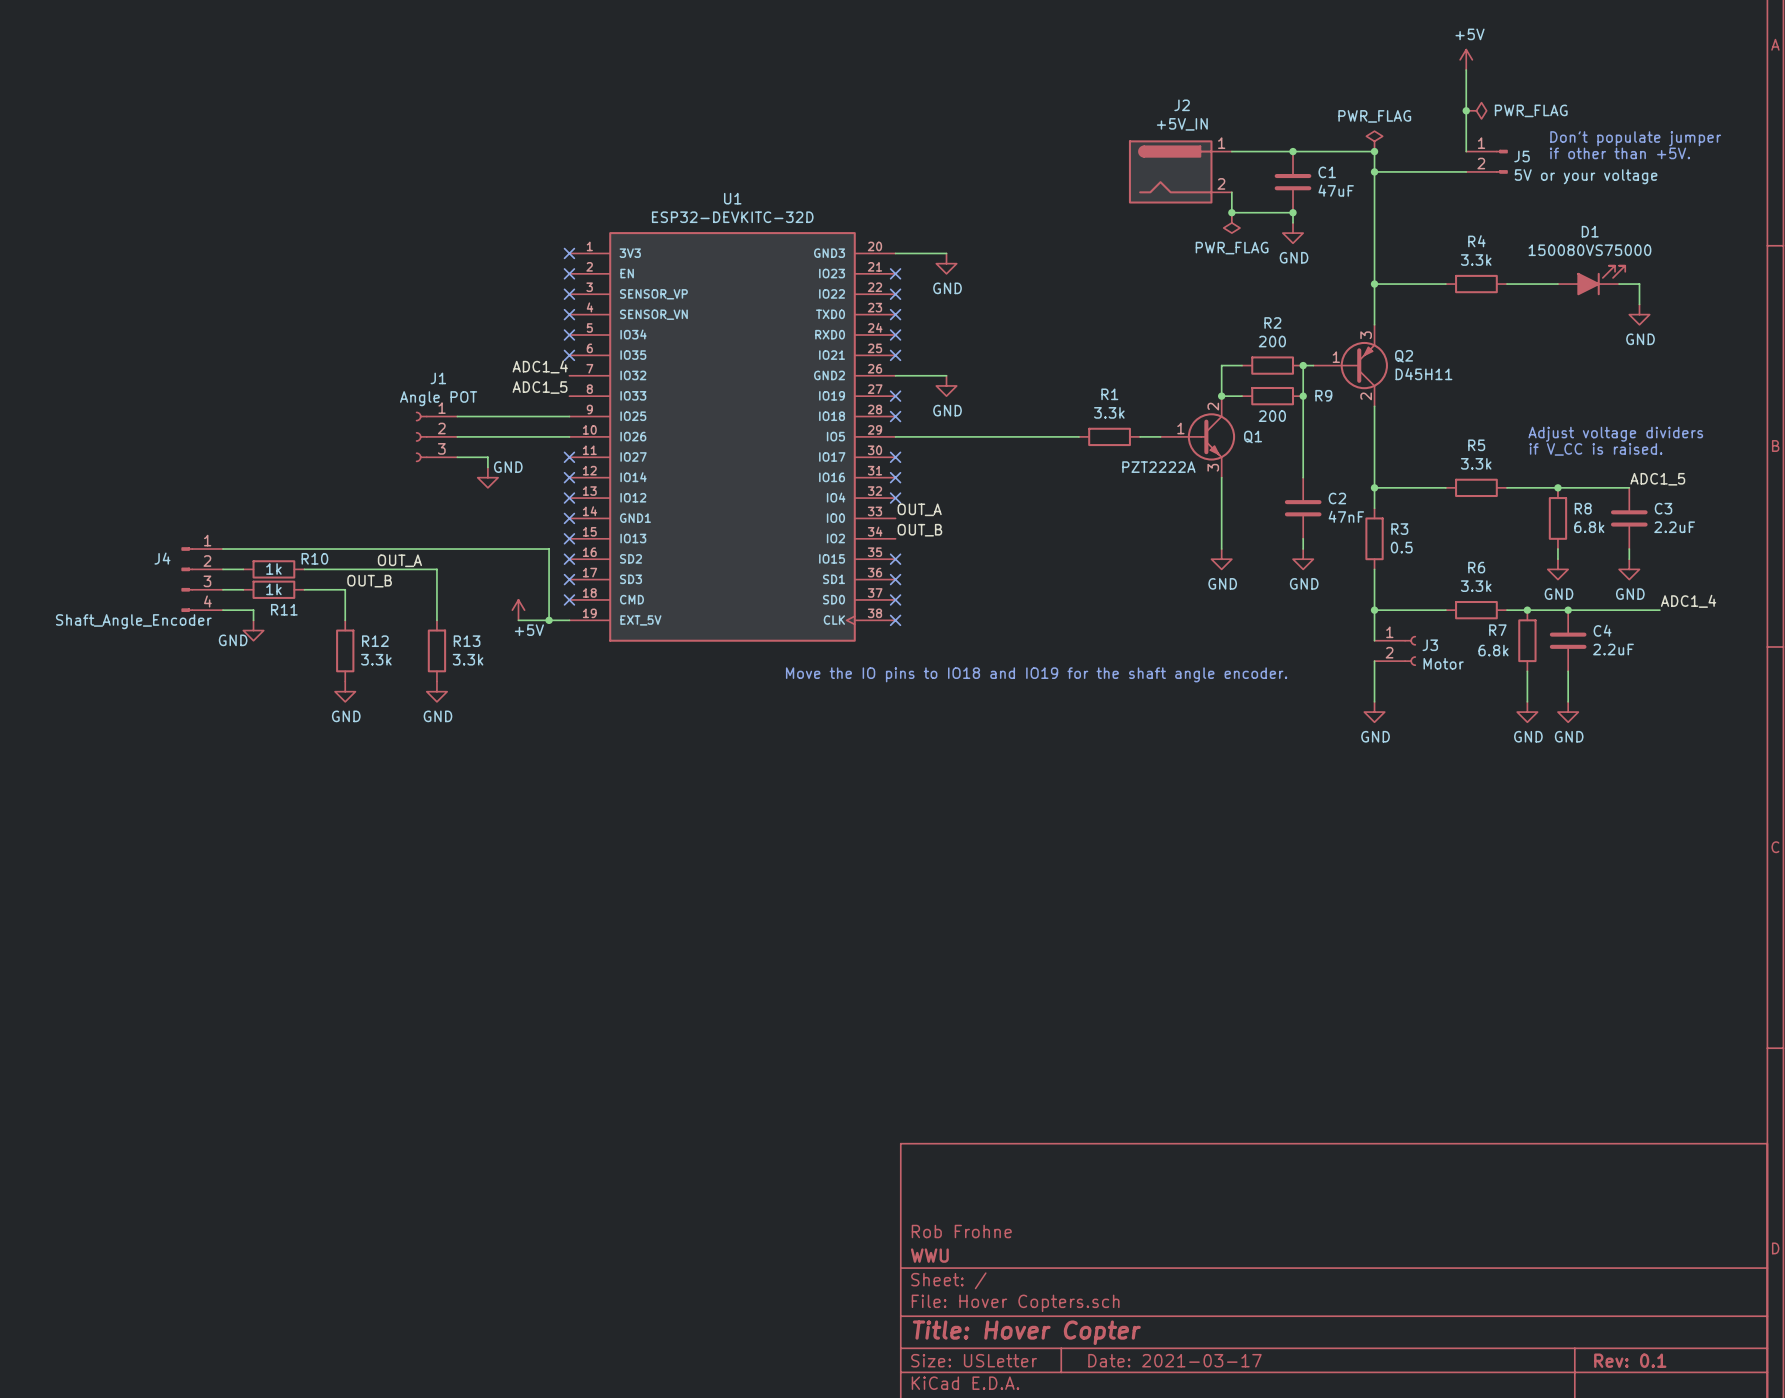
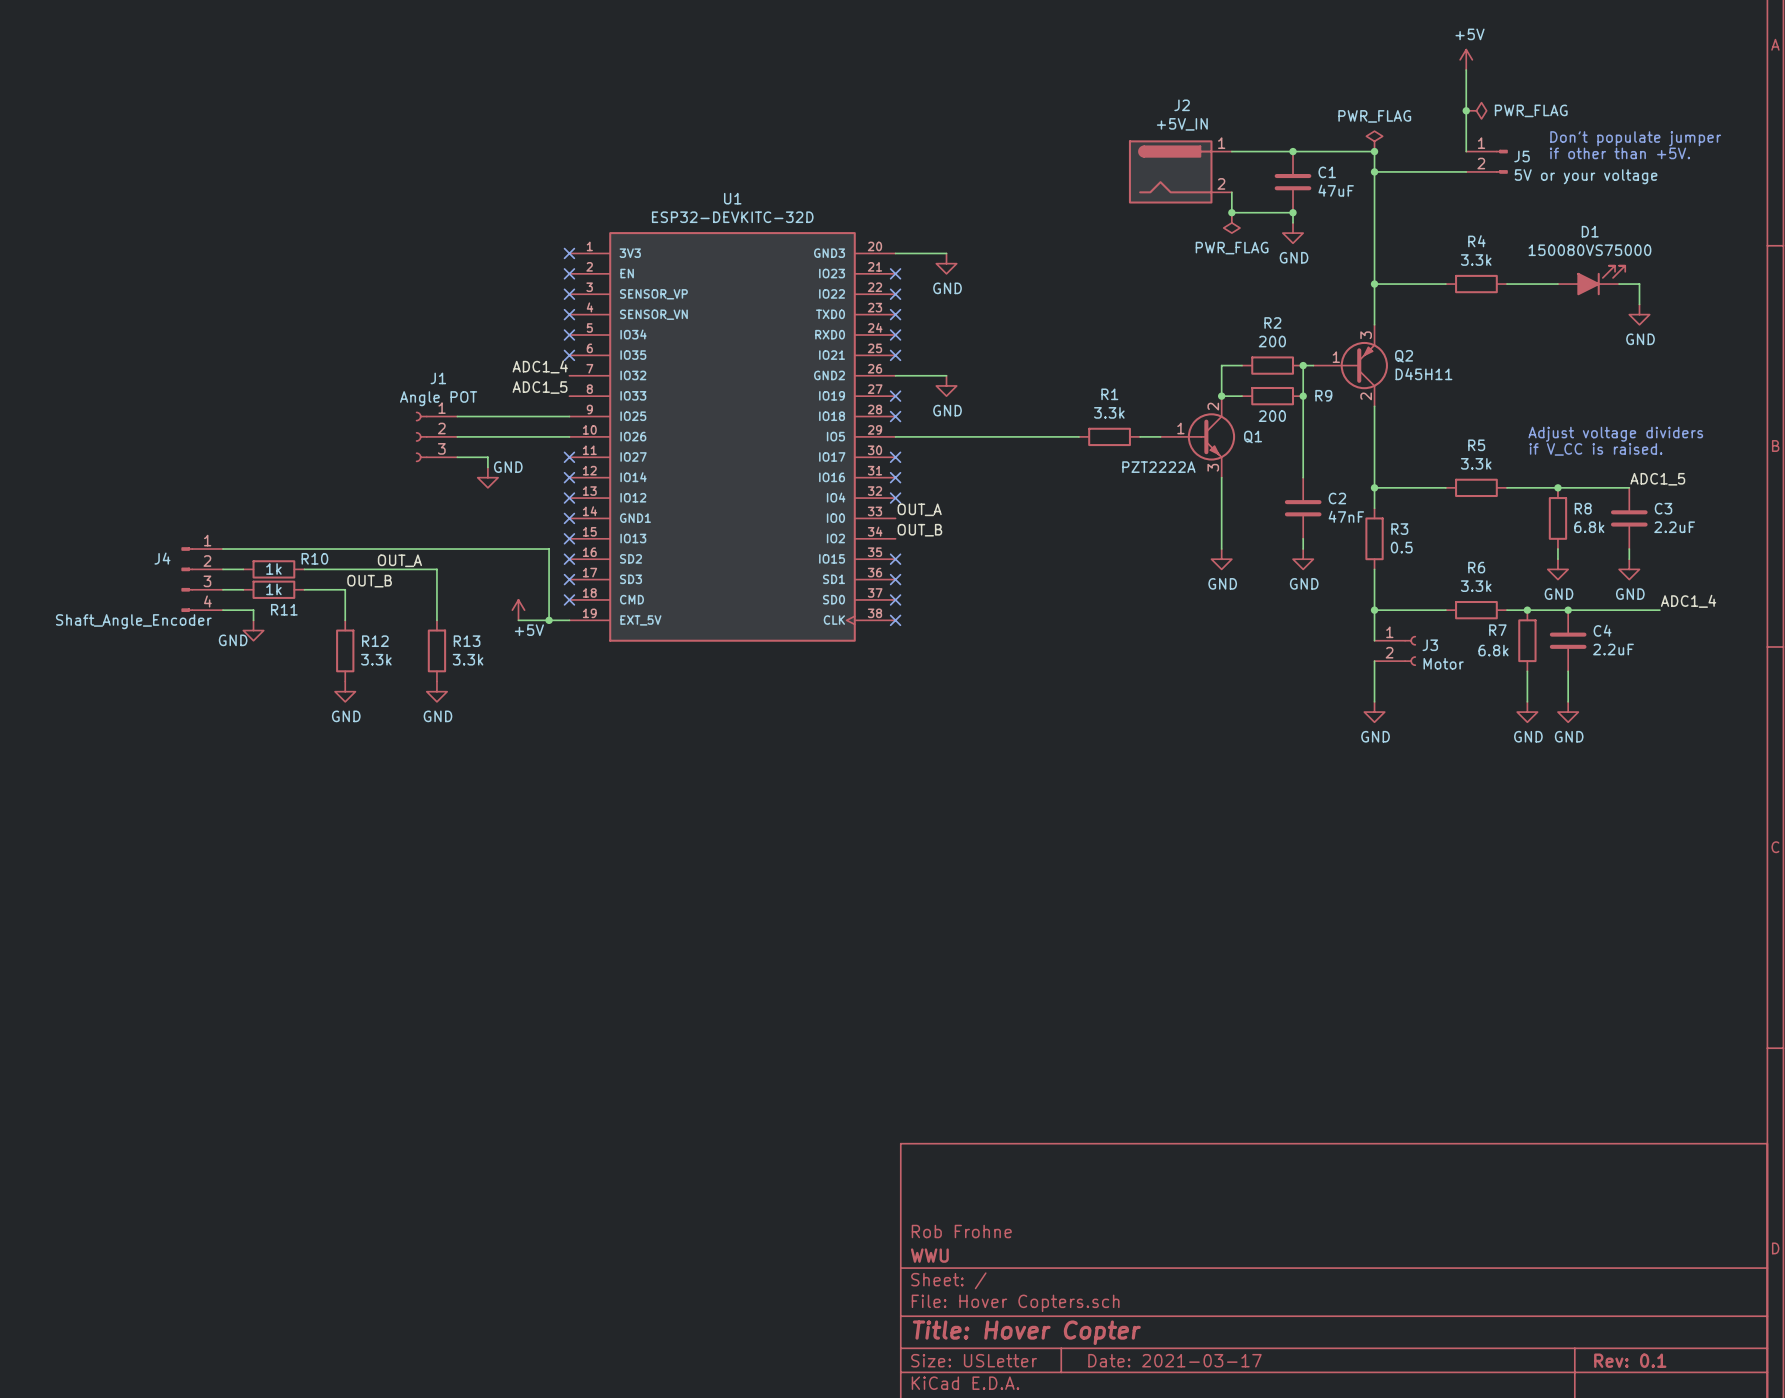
text: Move the IO pins to IO18 and IO19 for the shaft angle encoder. (1036, 674) -> none

